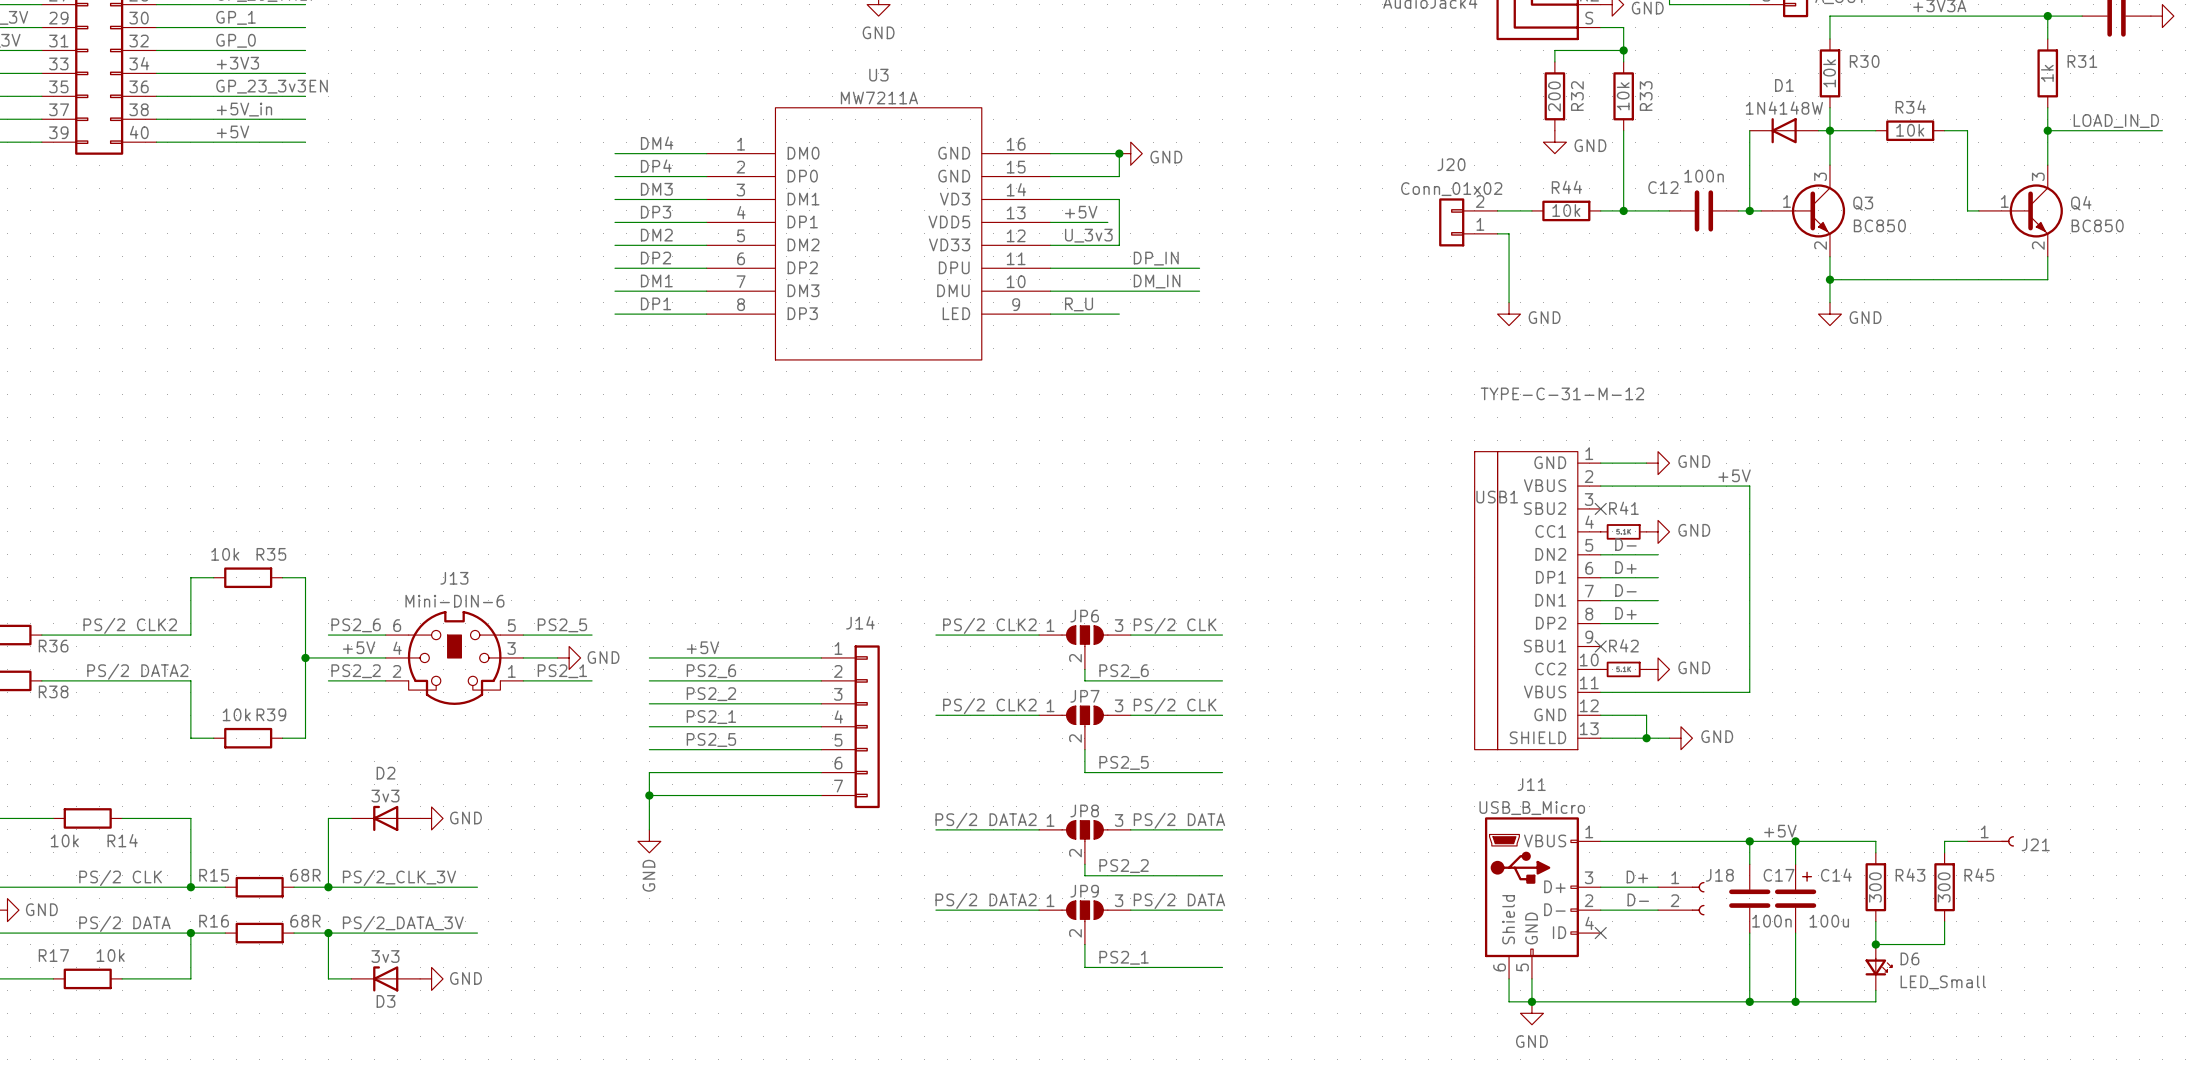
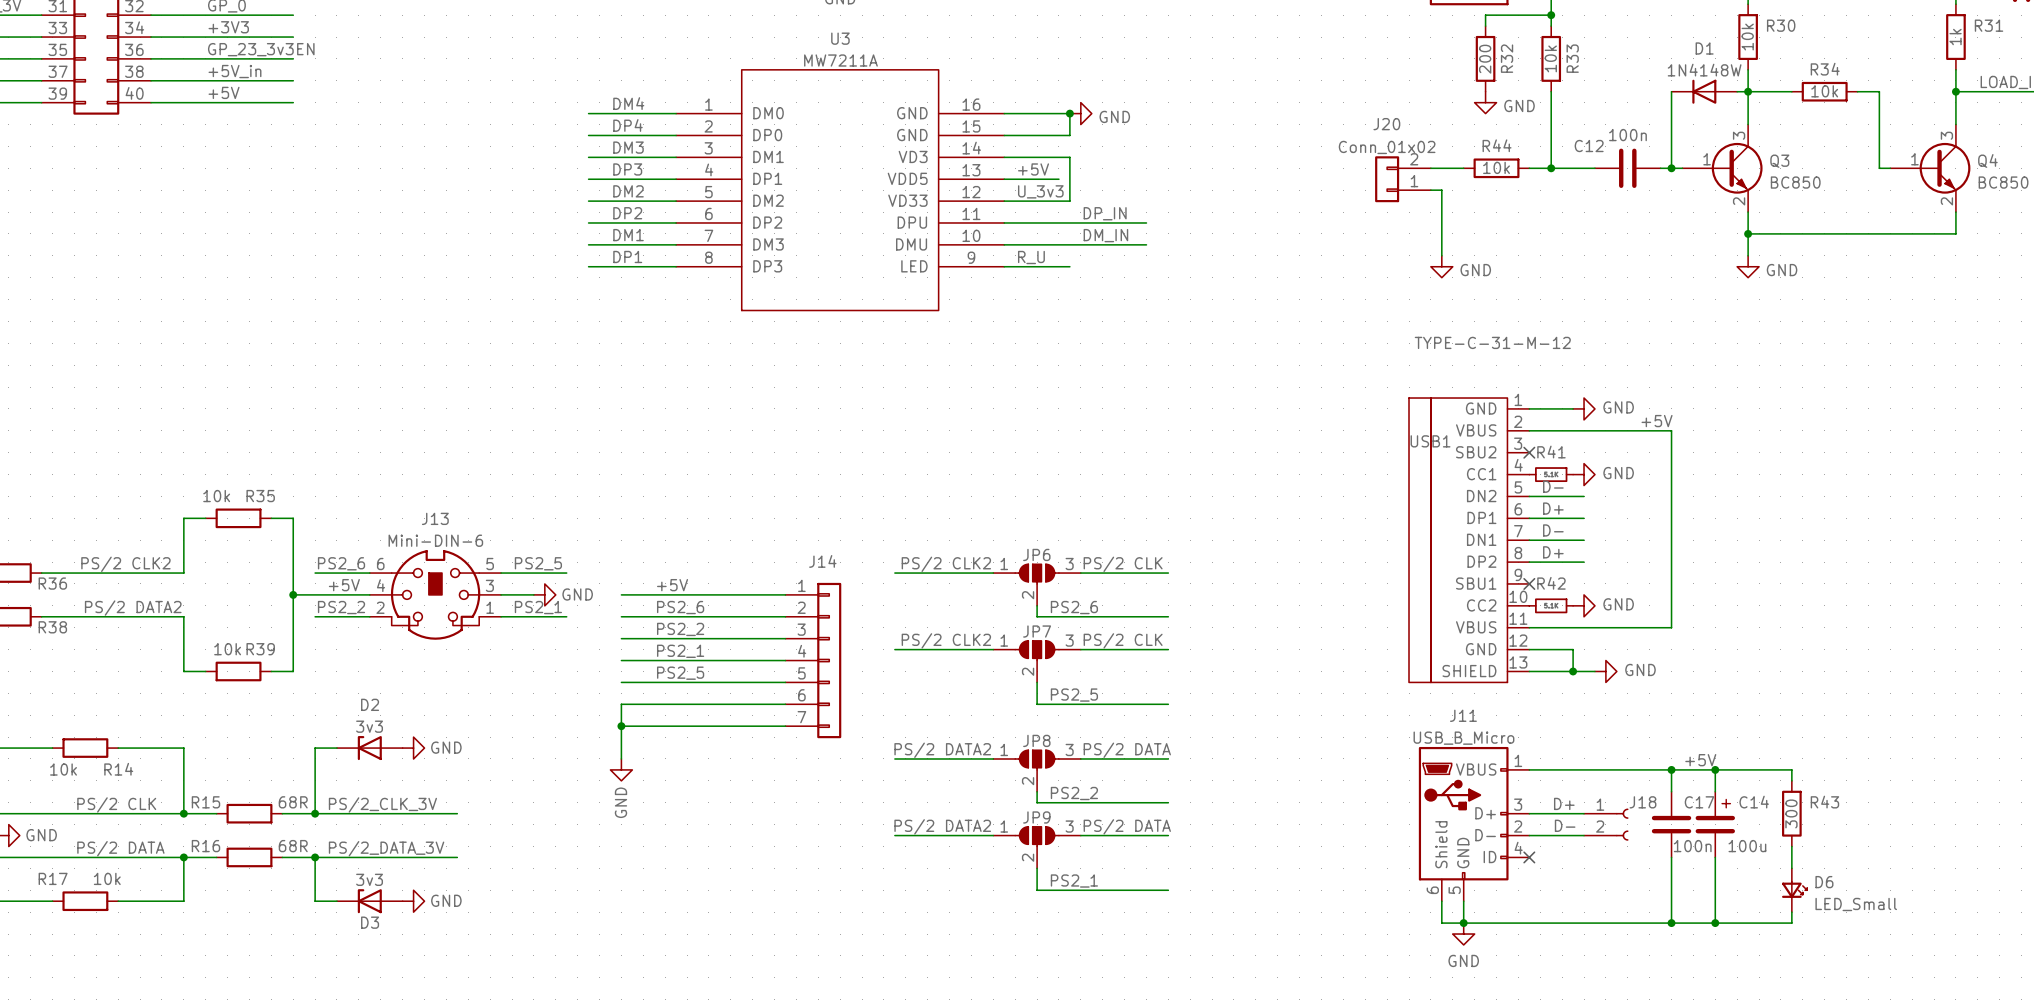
wire: (1967, 841) (1944, 841) (1944, 852) -> none
J21: (1990, 841) -> none
R45: 300 (1944, 887) -> none
wire: (1944, 921) (1944, 944) (1875, 944) -> none
junction: (1875, 944) -> none

